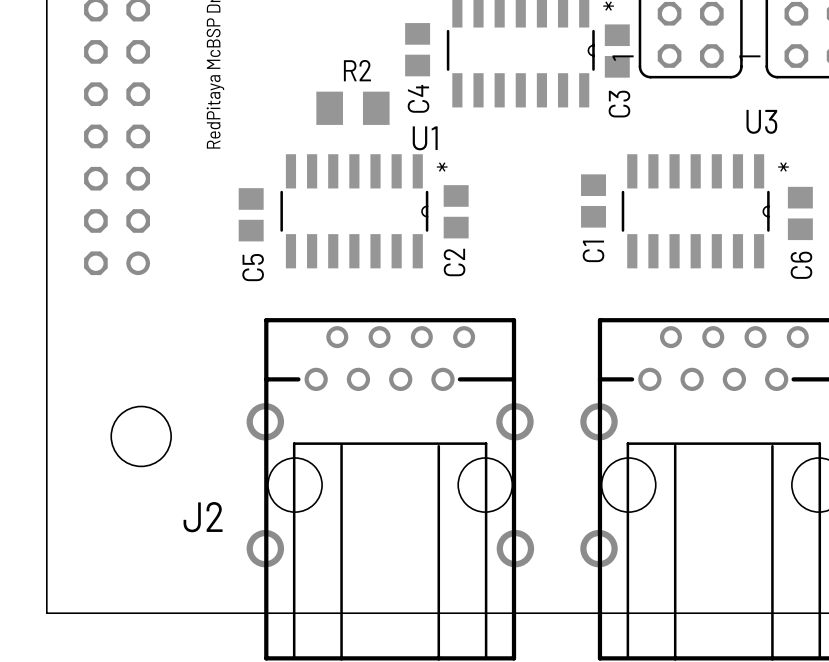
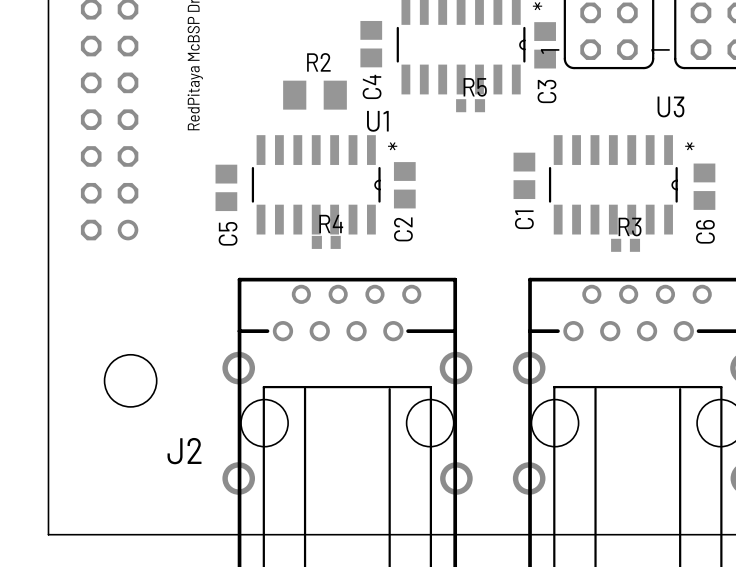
R5: none -> (470, 105)
R4: none -> (326, 242)
R3: none -> (625, 245)

